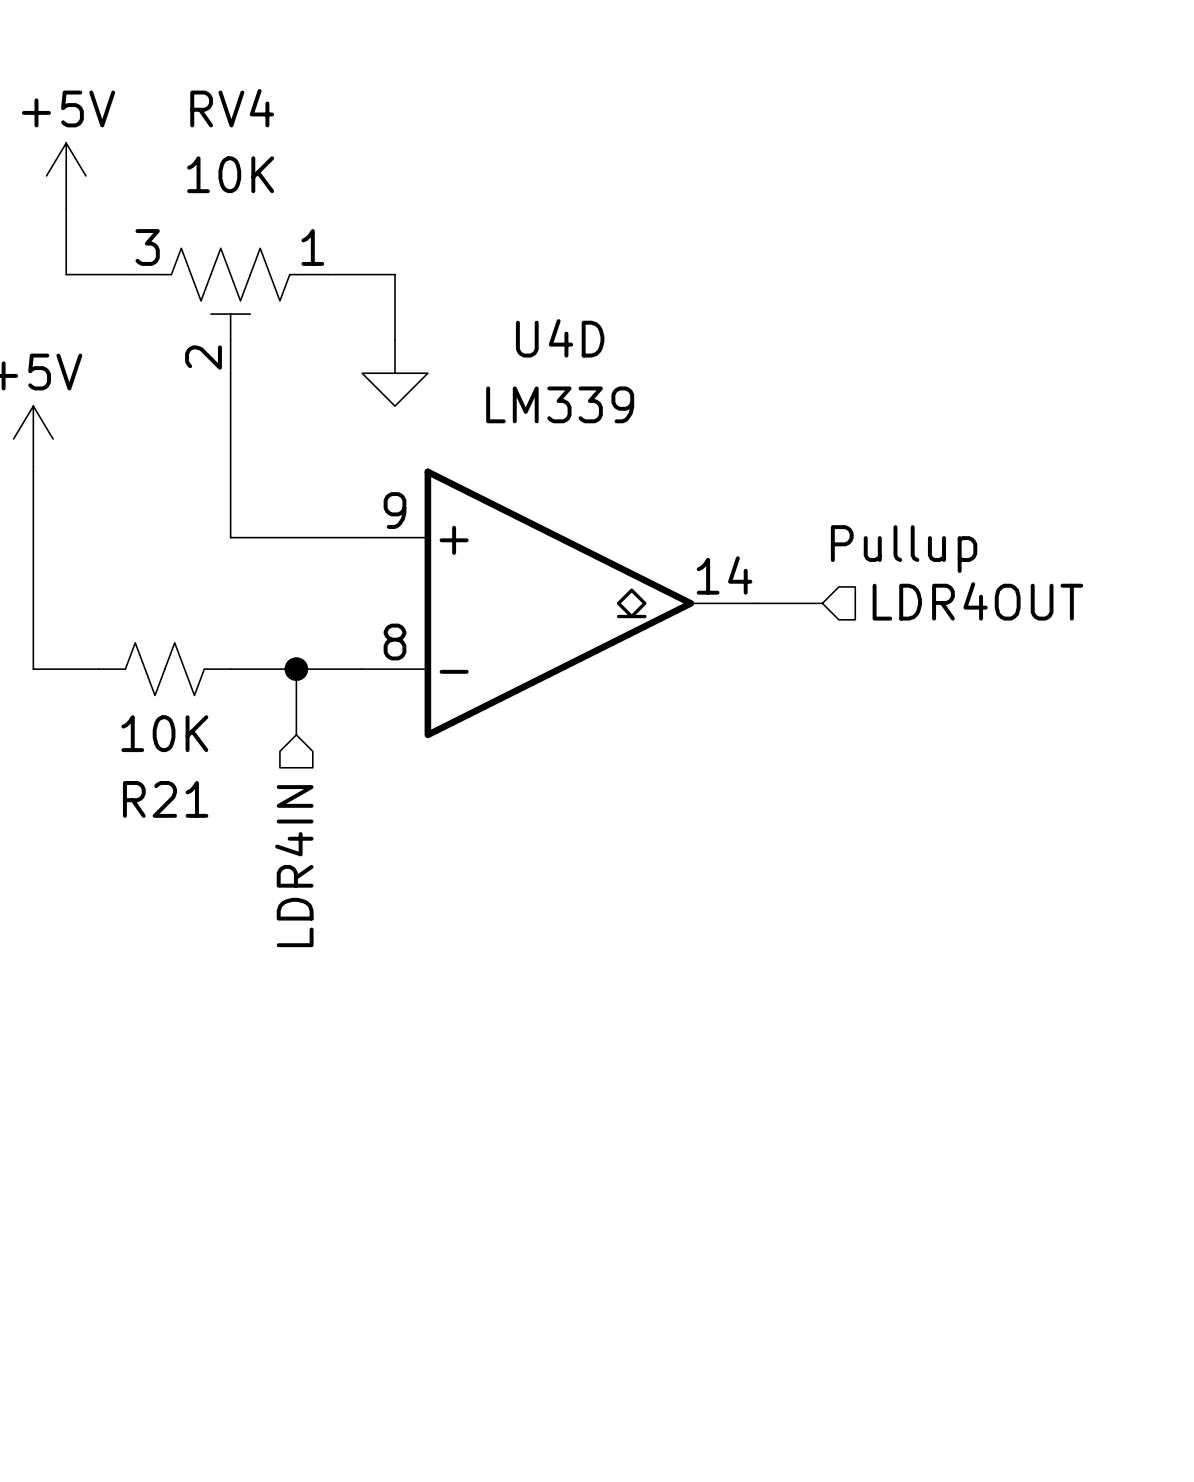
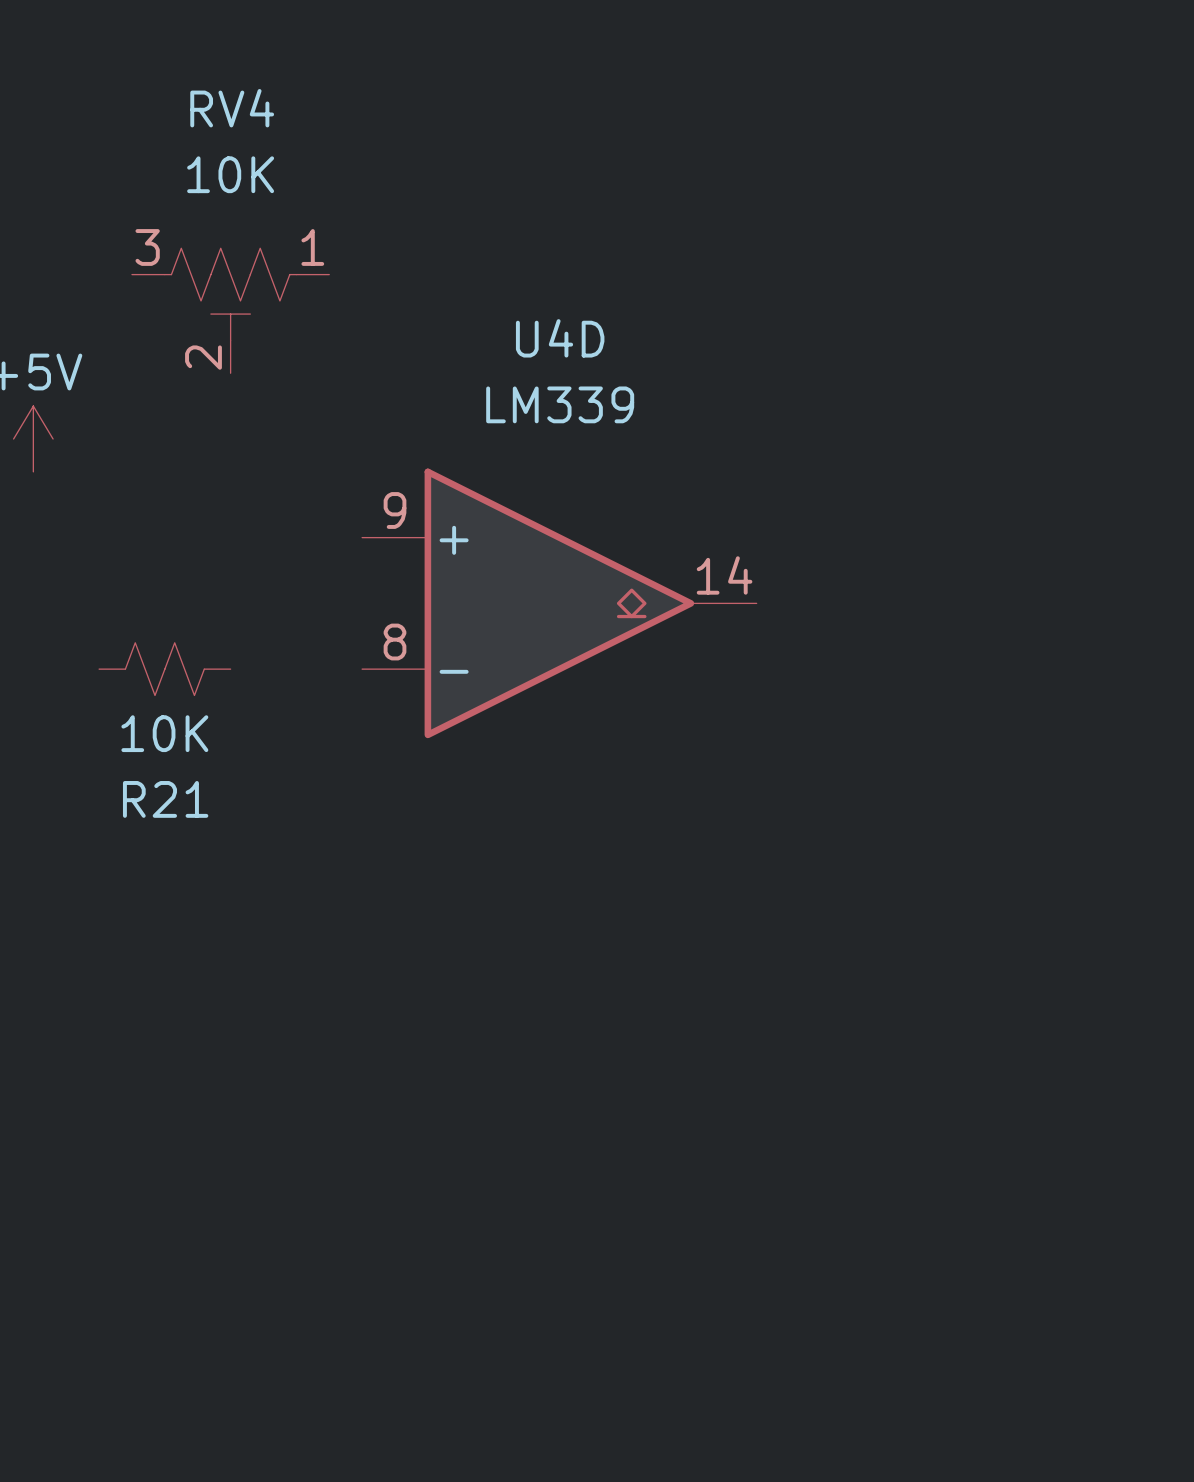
power symbol: +5V (66, 175) -> none
wire: (66, 208) (66, 274) (131, 274) -> none
wire: (329, 274) (395, 274) (395, 340) -> none
wire: (230, 373) (230, 537) (362, 537) -> none
power symbol: (395, 373) -> none
wire: (33, 471) (33, 669) (99, 669) -> none
text: Pullup (904, 549) -> none
hierarchical label: LDR4OUT (977, 601) -> none
wire: (756, 603) (822, 603) -> none
wire: (230, 669) (362, 669) -> none
wire: (296, 669) (296, 734) -> none
junction: (296, 669) -> none
hierarchical label: LDR4IN (294, 866) -> none

